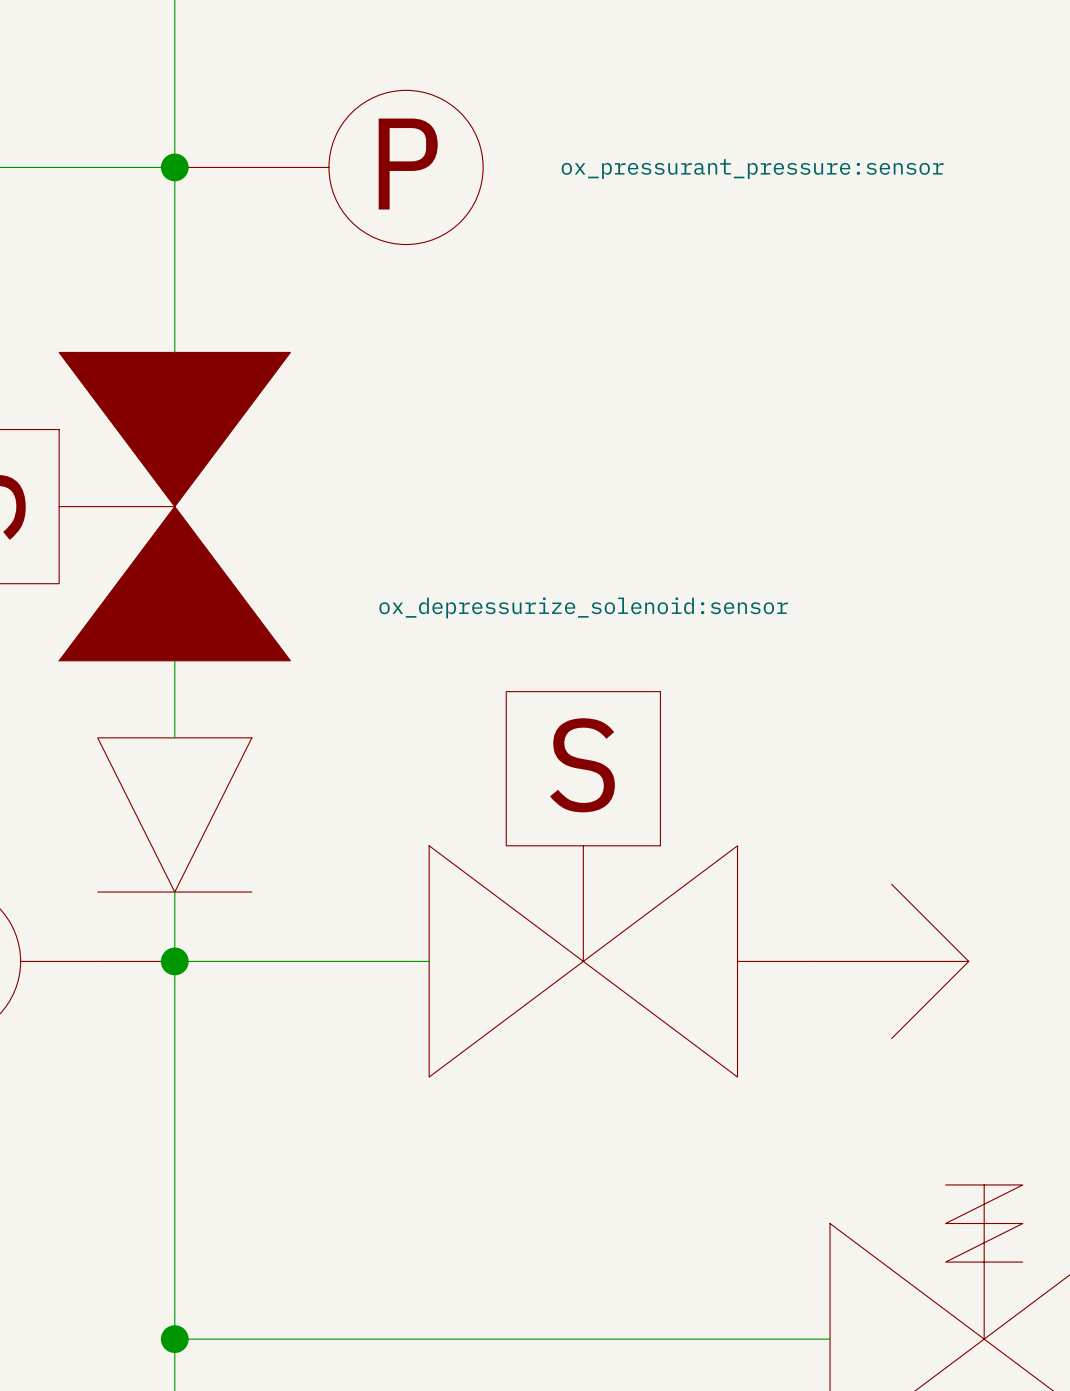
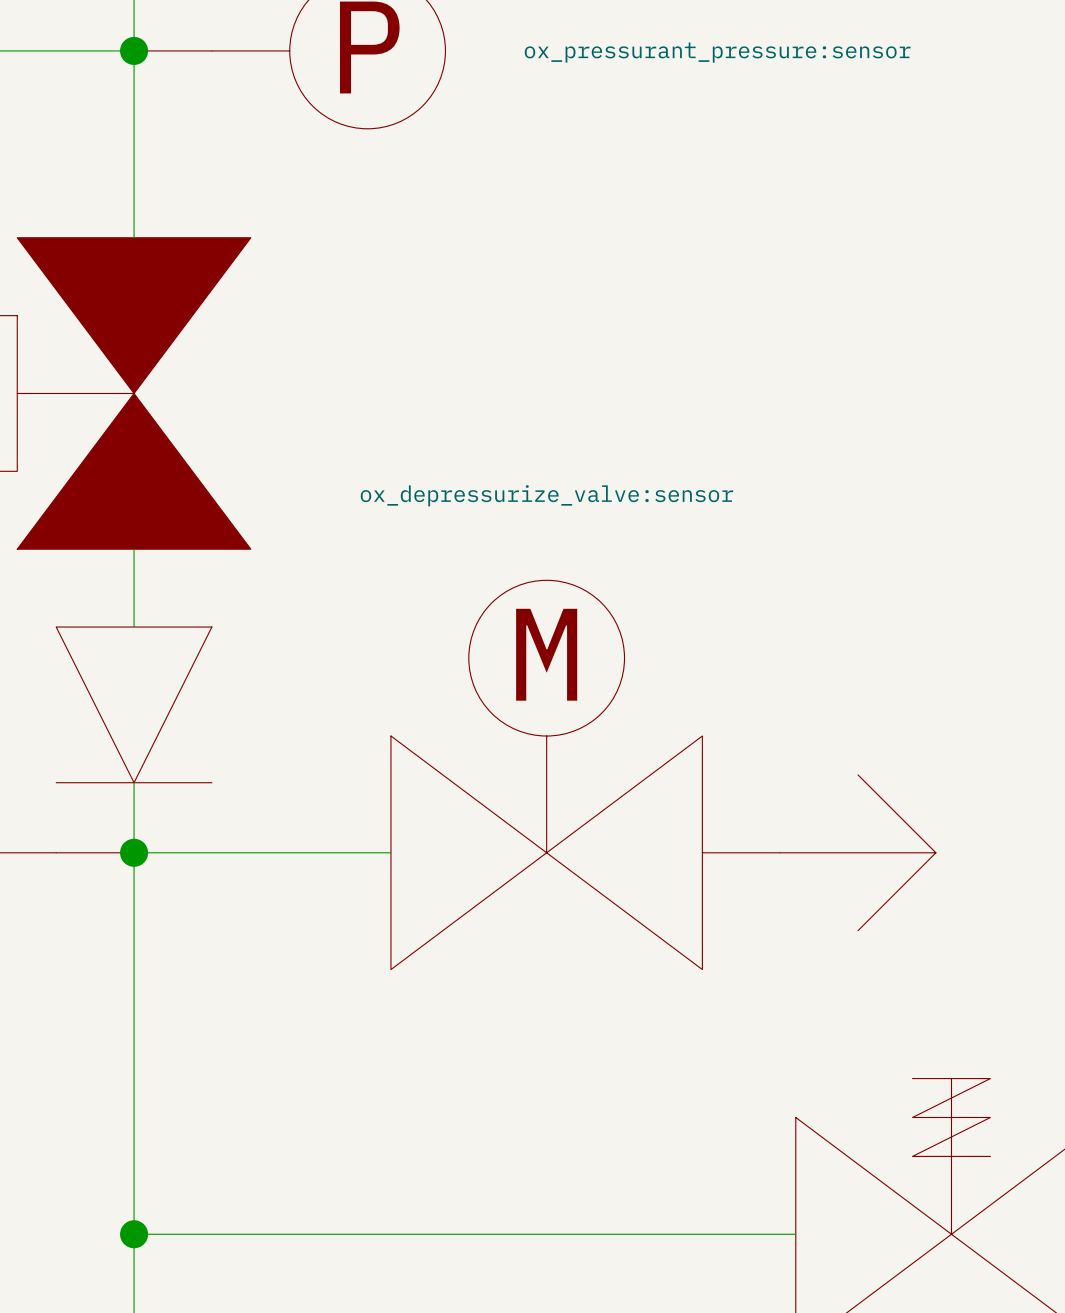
part value: ox_depressurize_solenoid:sensor (583, 607) -> ox_depressurize_valve:sensor (546, 495)
part symbol: [429, 691, 738, 1078] -> [390, 580, 703, 970]

